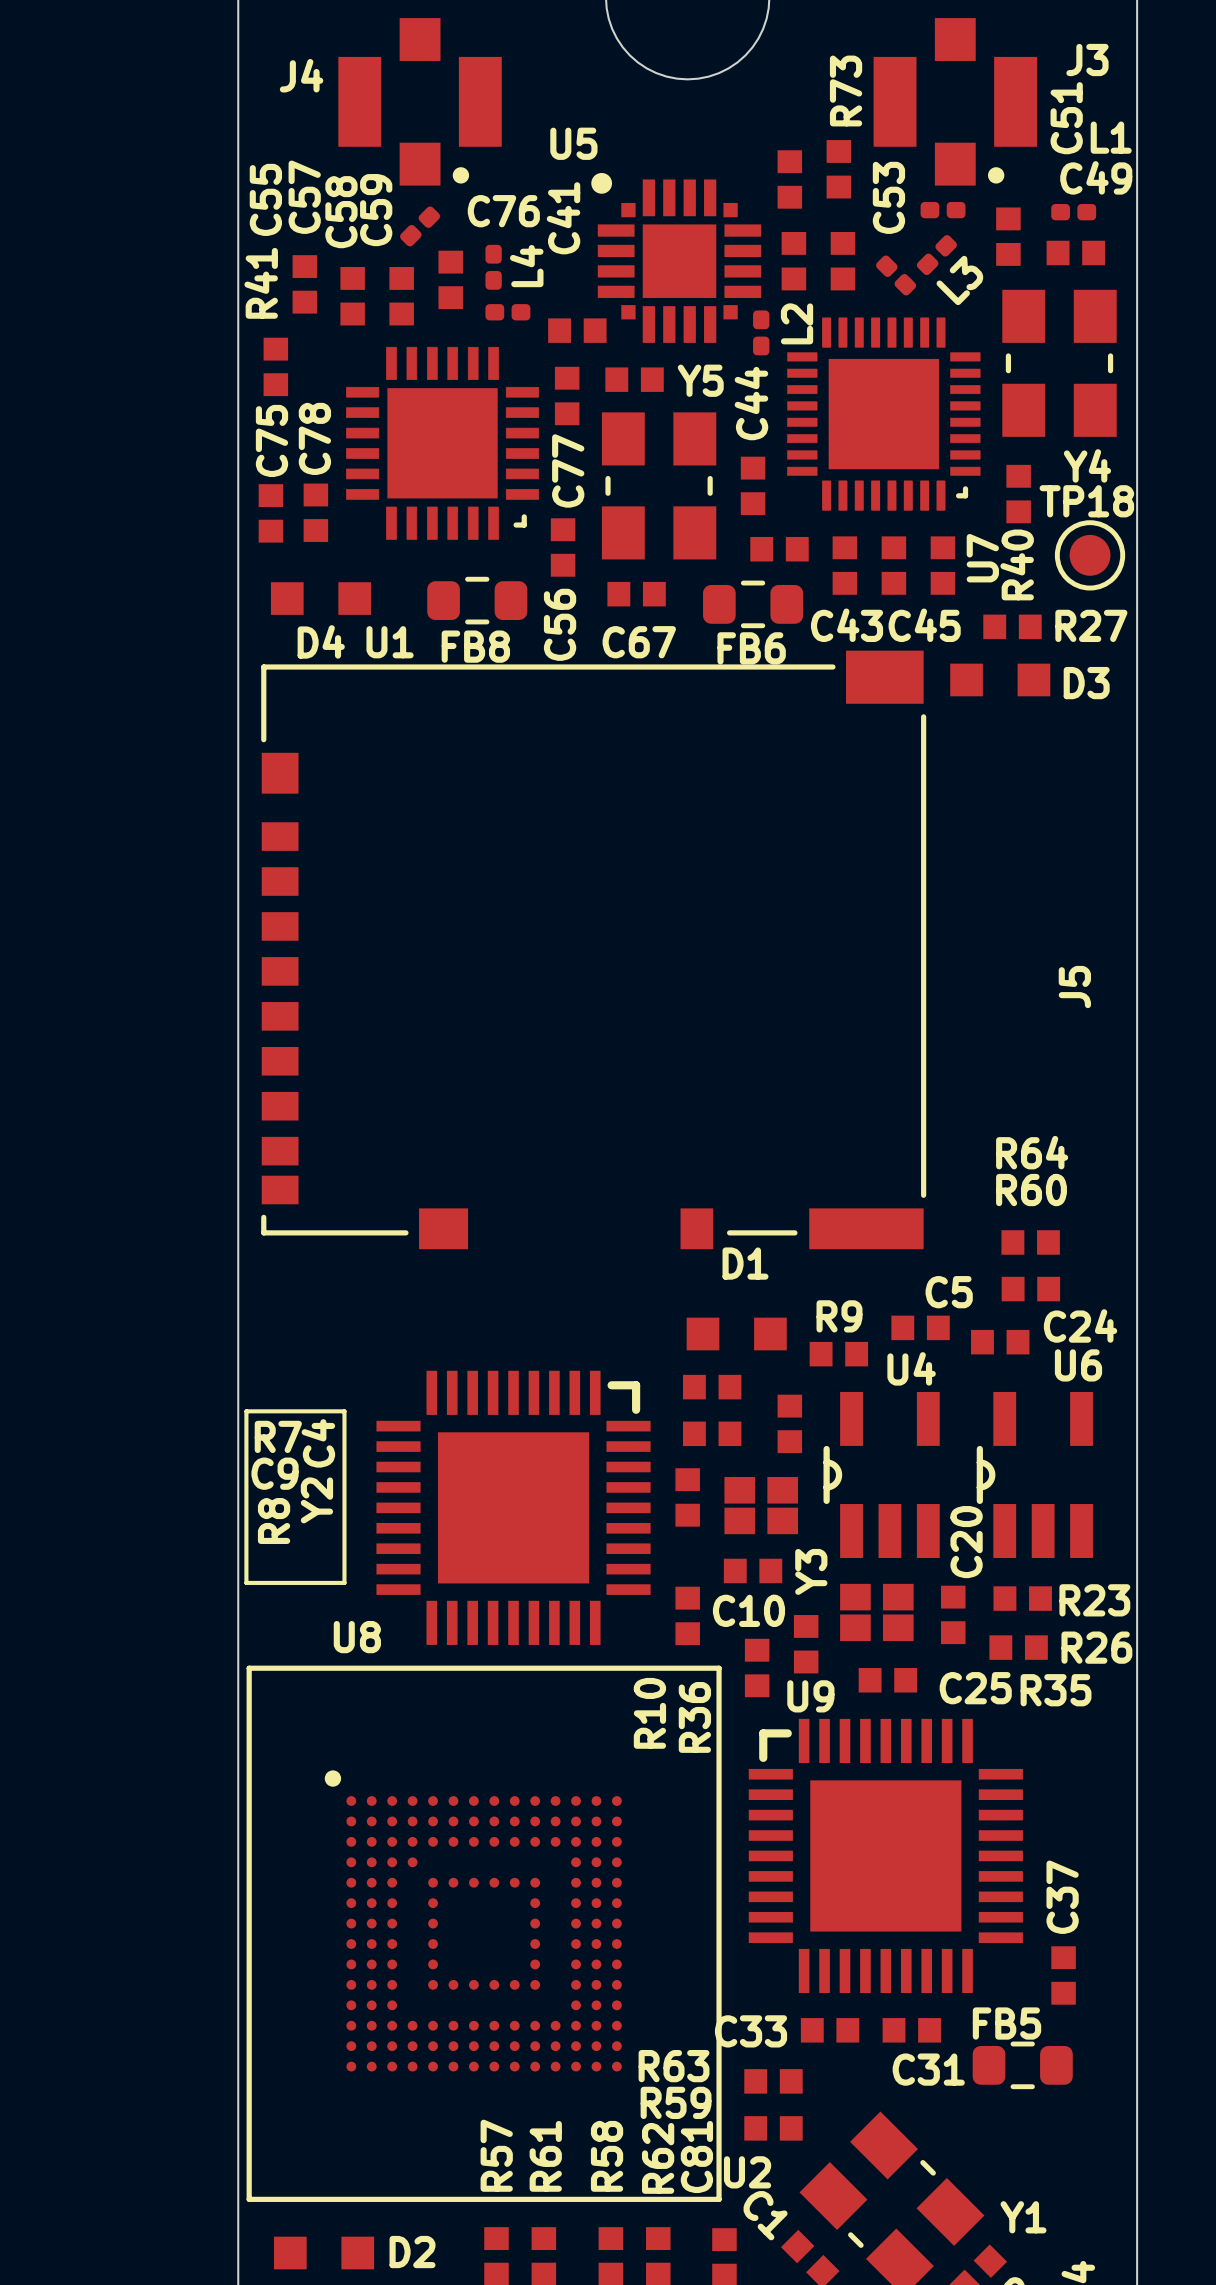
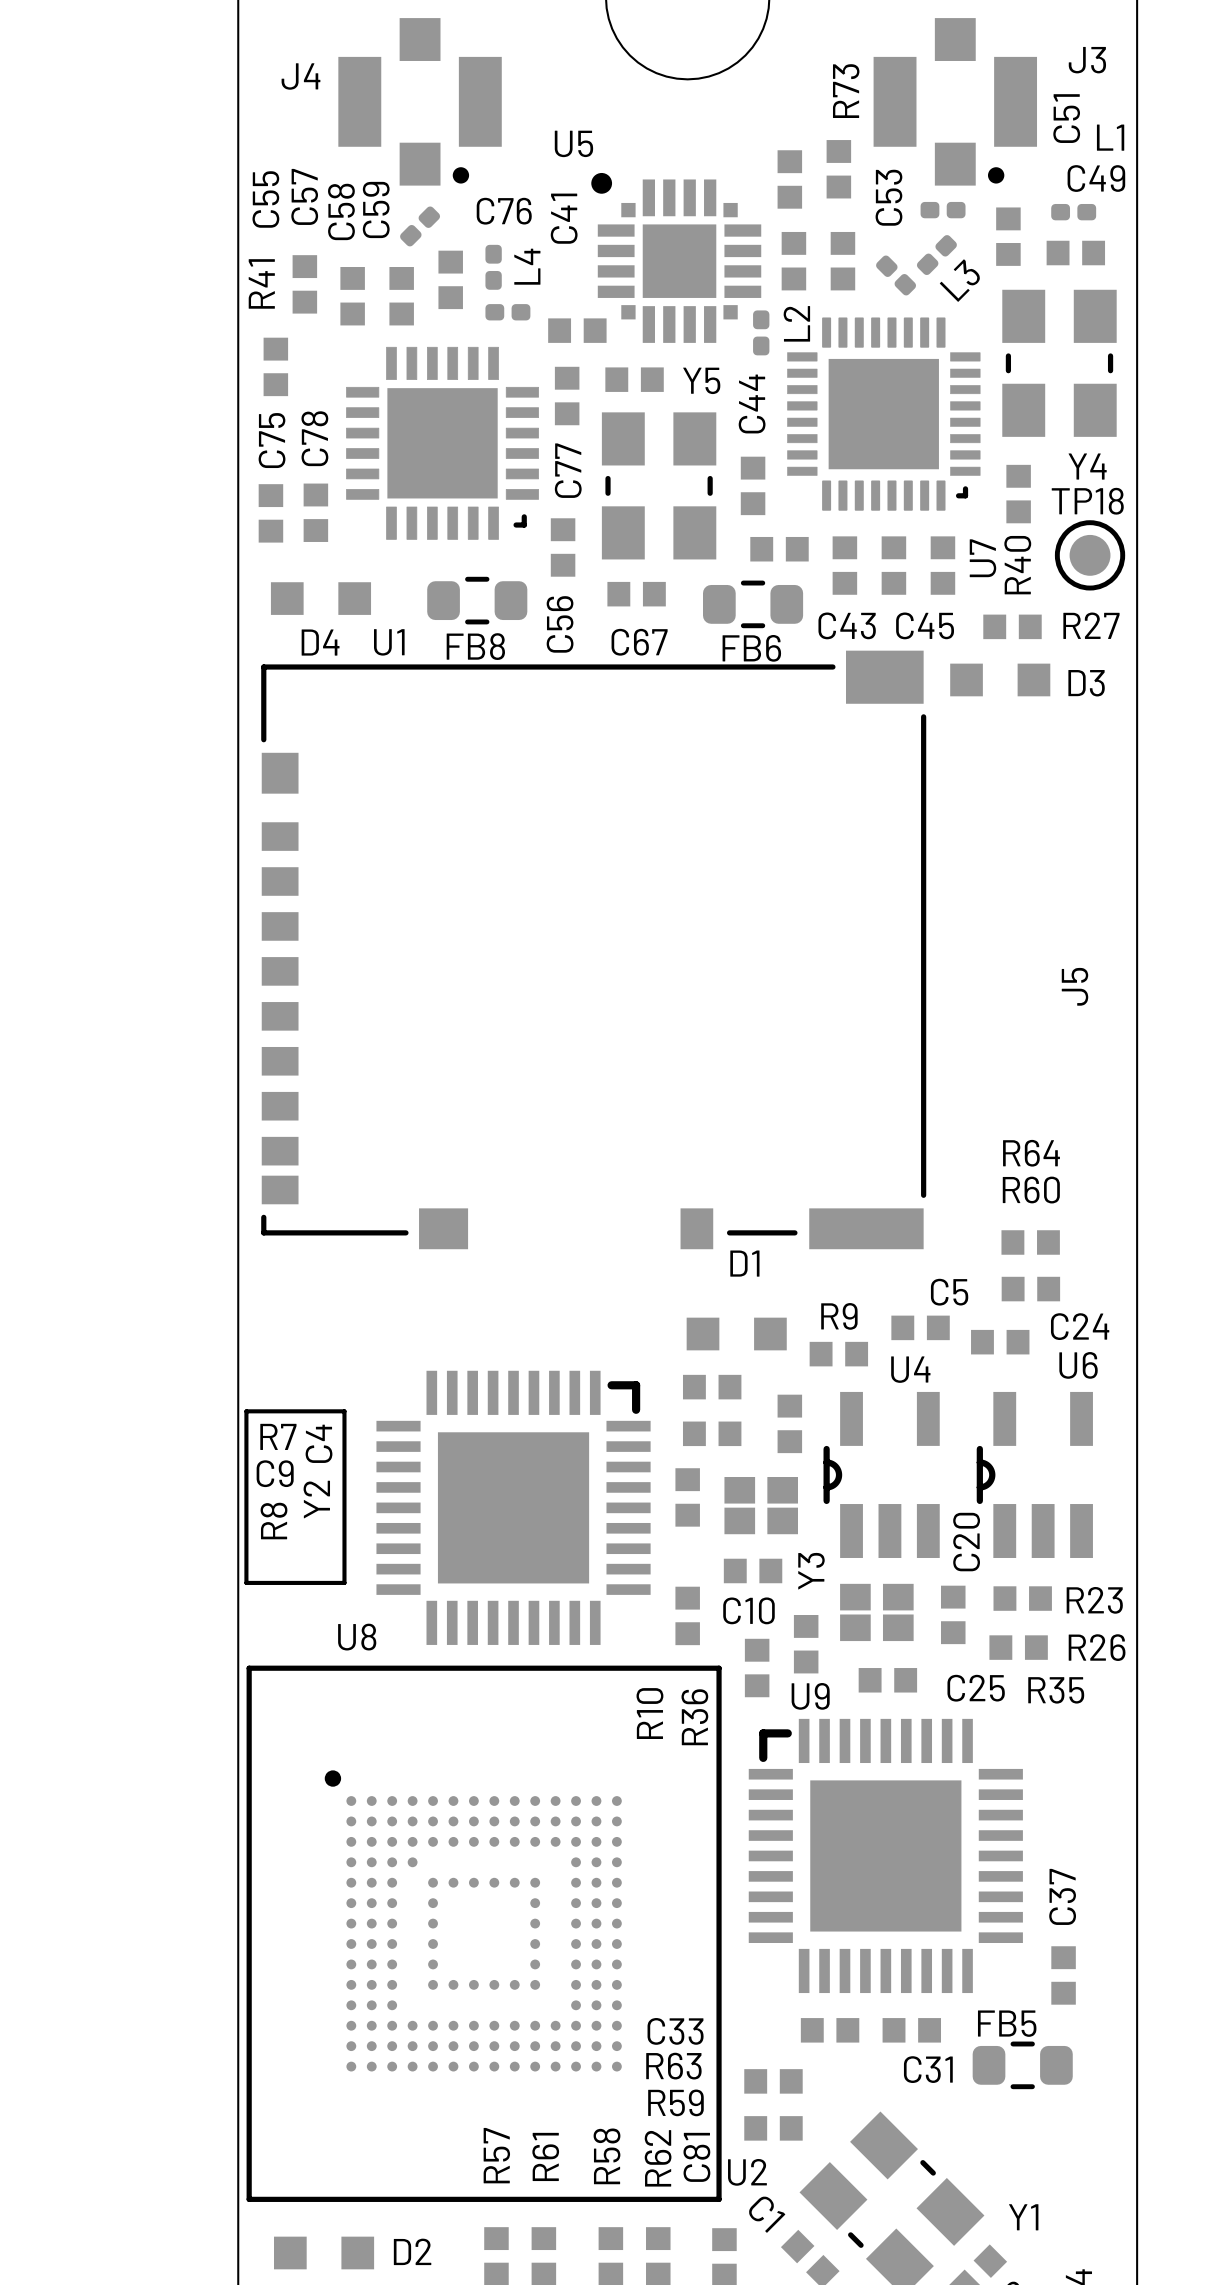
C33 name position: C33 (751, 2031) -> C33 (675, 2031)

